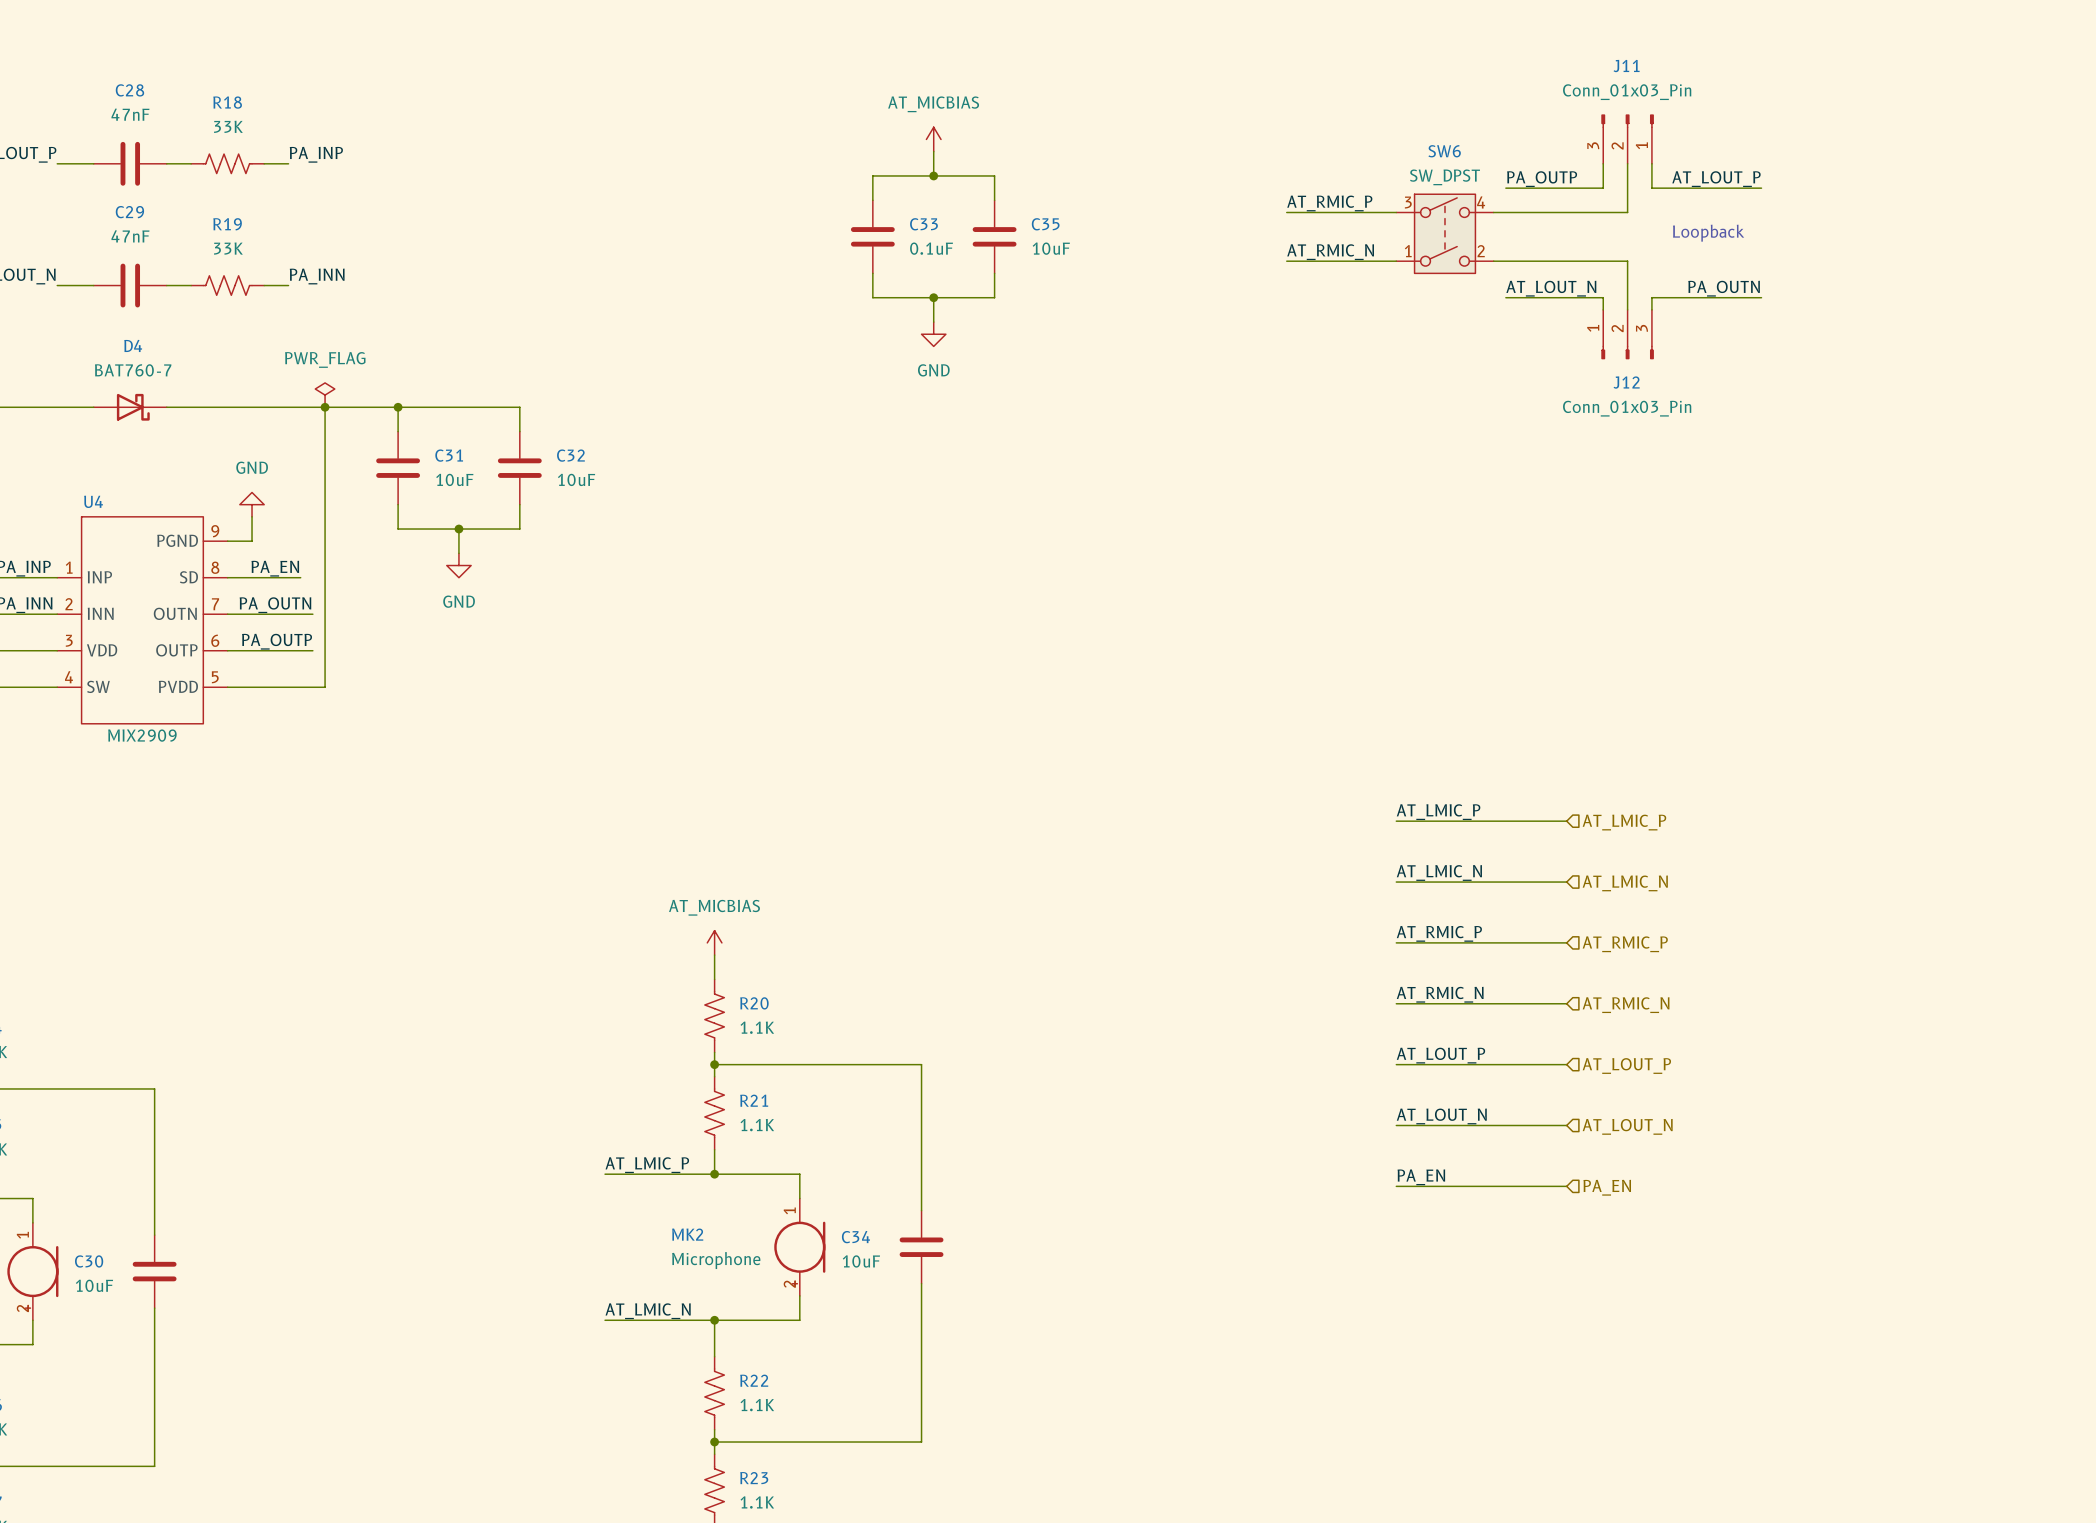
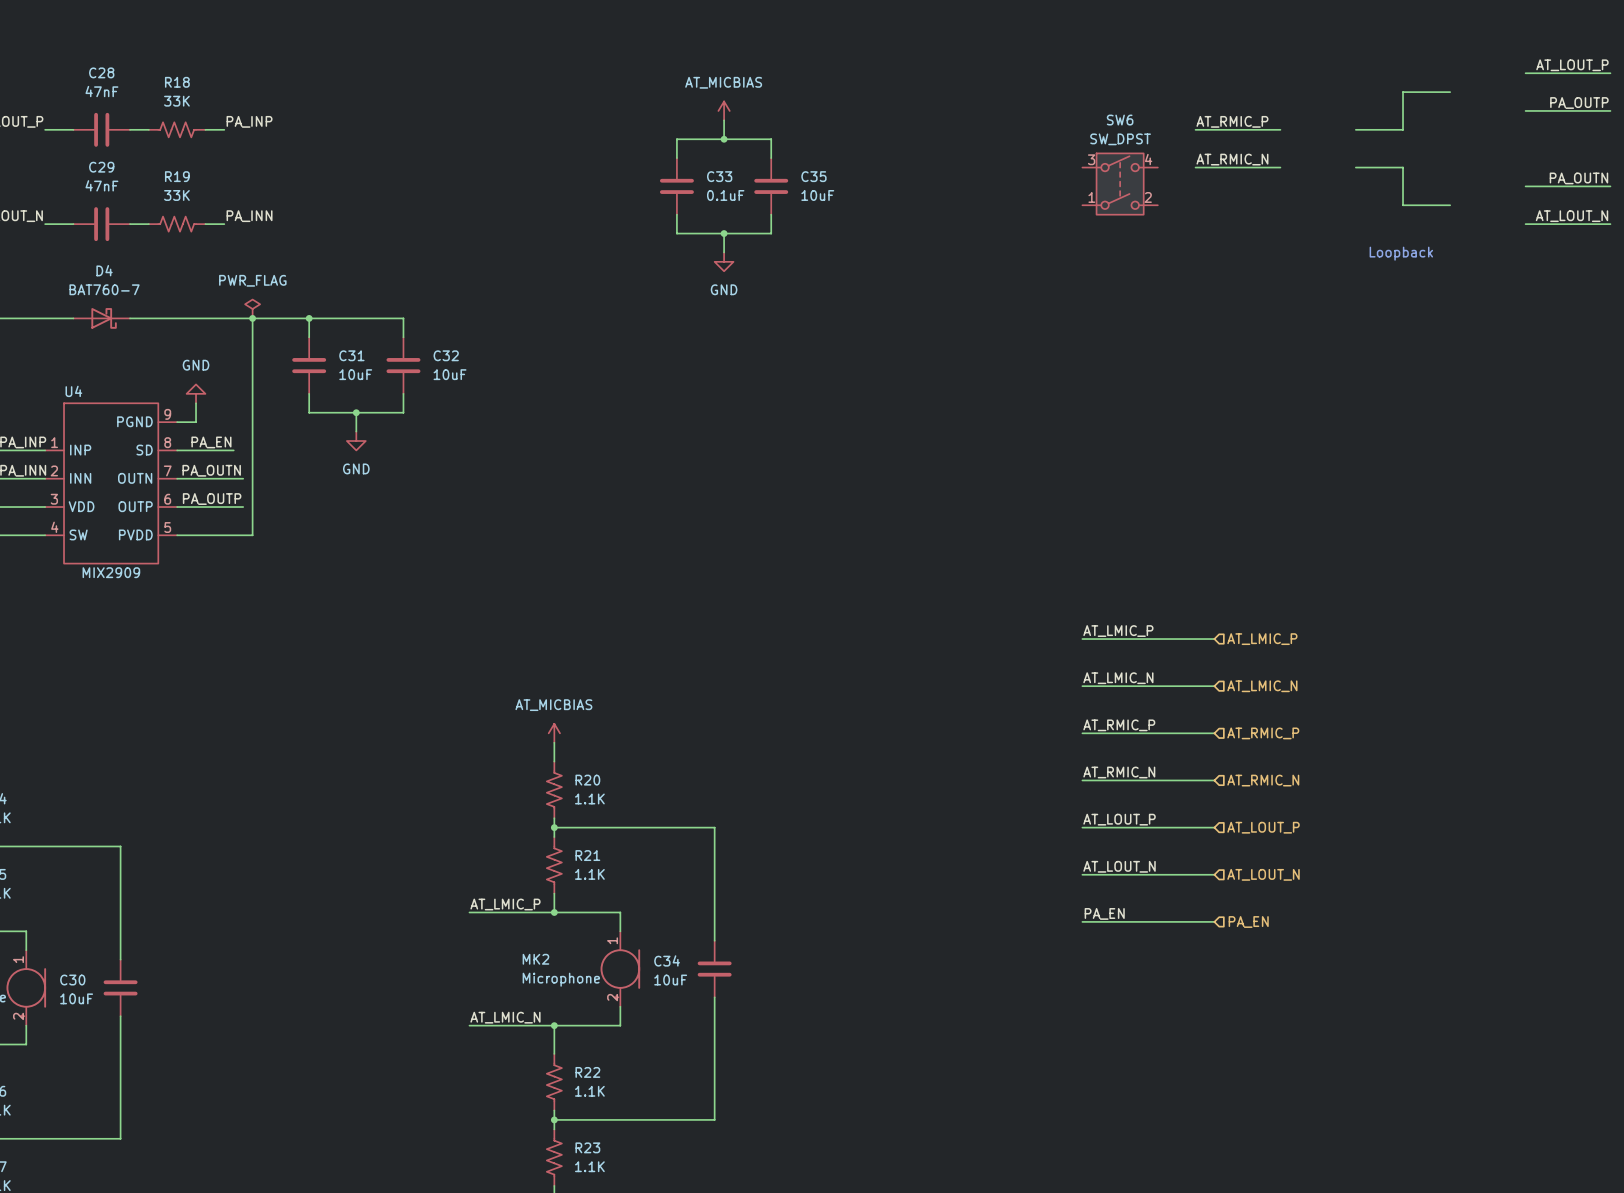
label: none -> AT_LOUT_P (1572, 65)
wire: none -> (1525, 73) (1610, 73)
wire: none -> (1450, 92) (1403, 92) (1403, 129) (1355, 129)
label: none -> PA_OUTP (1579, 103)
J11: Conn_01x03_Pin (1627, 139) -> none
wire: none -> (1525, 110) (1610, 110)
label: none -> AT_RMIC_P (1232, 121)
wire: (1603, 163) (1603, 188) (1505, 188) -> none
wire: (1627, 163) (1627, 212) -> (1280, 167) (1261, 167)
wire: (1651, 163) (1651, 188) (1761, 188) -> (1280, 129) (1195, 129)
label: PA_OUTP (1542, 179) -> none
label: AT_LOUT_P (1716, 179) -> none
label: AT_RMIC_P (1329, 203) -> none
label: none -> AT_RMIC_N (1232, 159)
wire: (1286, 212) (1396, 212) -> none
wire: (1493, 212) (1542, 212) -> none
wire: none -> (1355, 167) (1403, 167) (1403, 205) (1450, 205)
label: none -> PA_OUTN (1578, 178)
text position: Loopback (1708, 233) -> Loopback (1401, 253)
wire: none -> (1525, 186) (1610, 186)
label: AT_RMIC_N (1330, 252) -> none
wire: (1286, 261) (1396, 261) -> none
wire: (1493, 261) (1627, 261) (1627, 309) -> none
label: none -> AT_LOUT_N (1571, 216)
wire: none -> (1525, 224) (1610, 224)
label: AT_LOUT_N (1551, 288) -> none
label: PA_OUTN (1724, 288) -> none
wire: (1505, 297) (1603, 297) (1603, 309) -> none
wire: (1761, 297) (1651, 297) (1651, 309) -> none
J12: Conn_01x03_Pin (1627, 334) -> none

